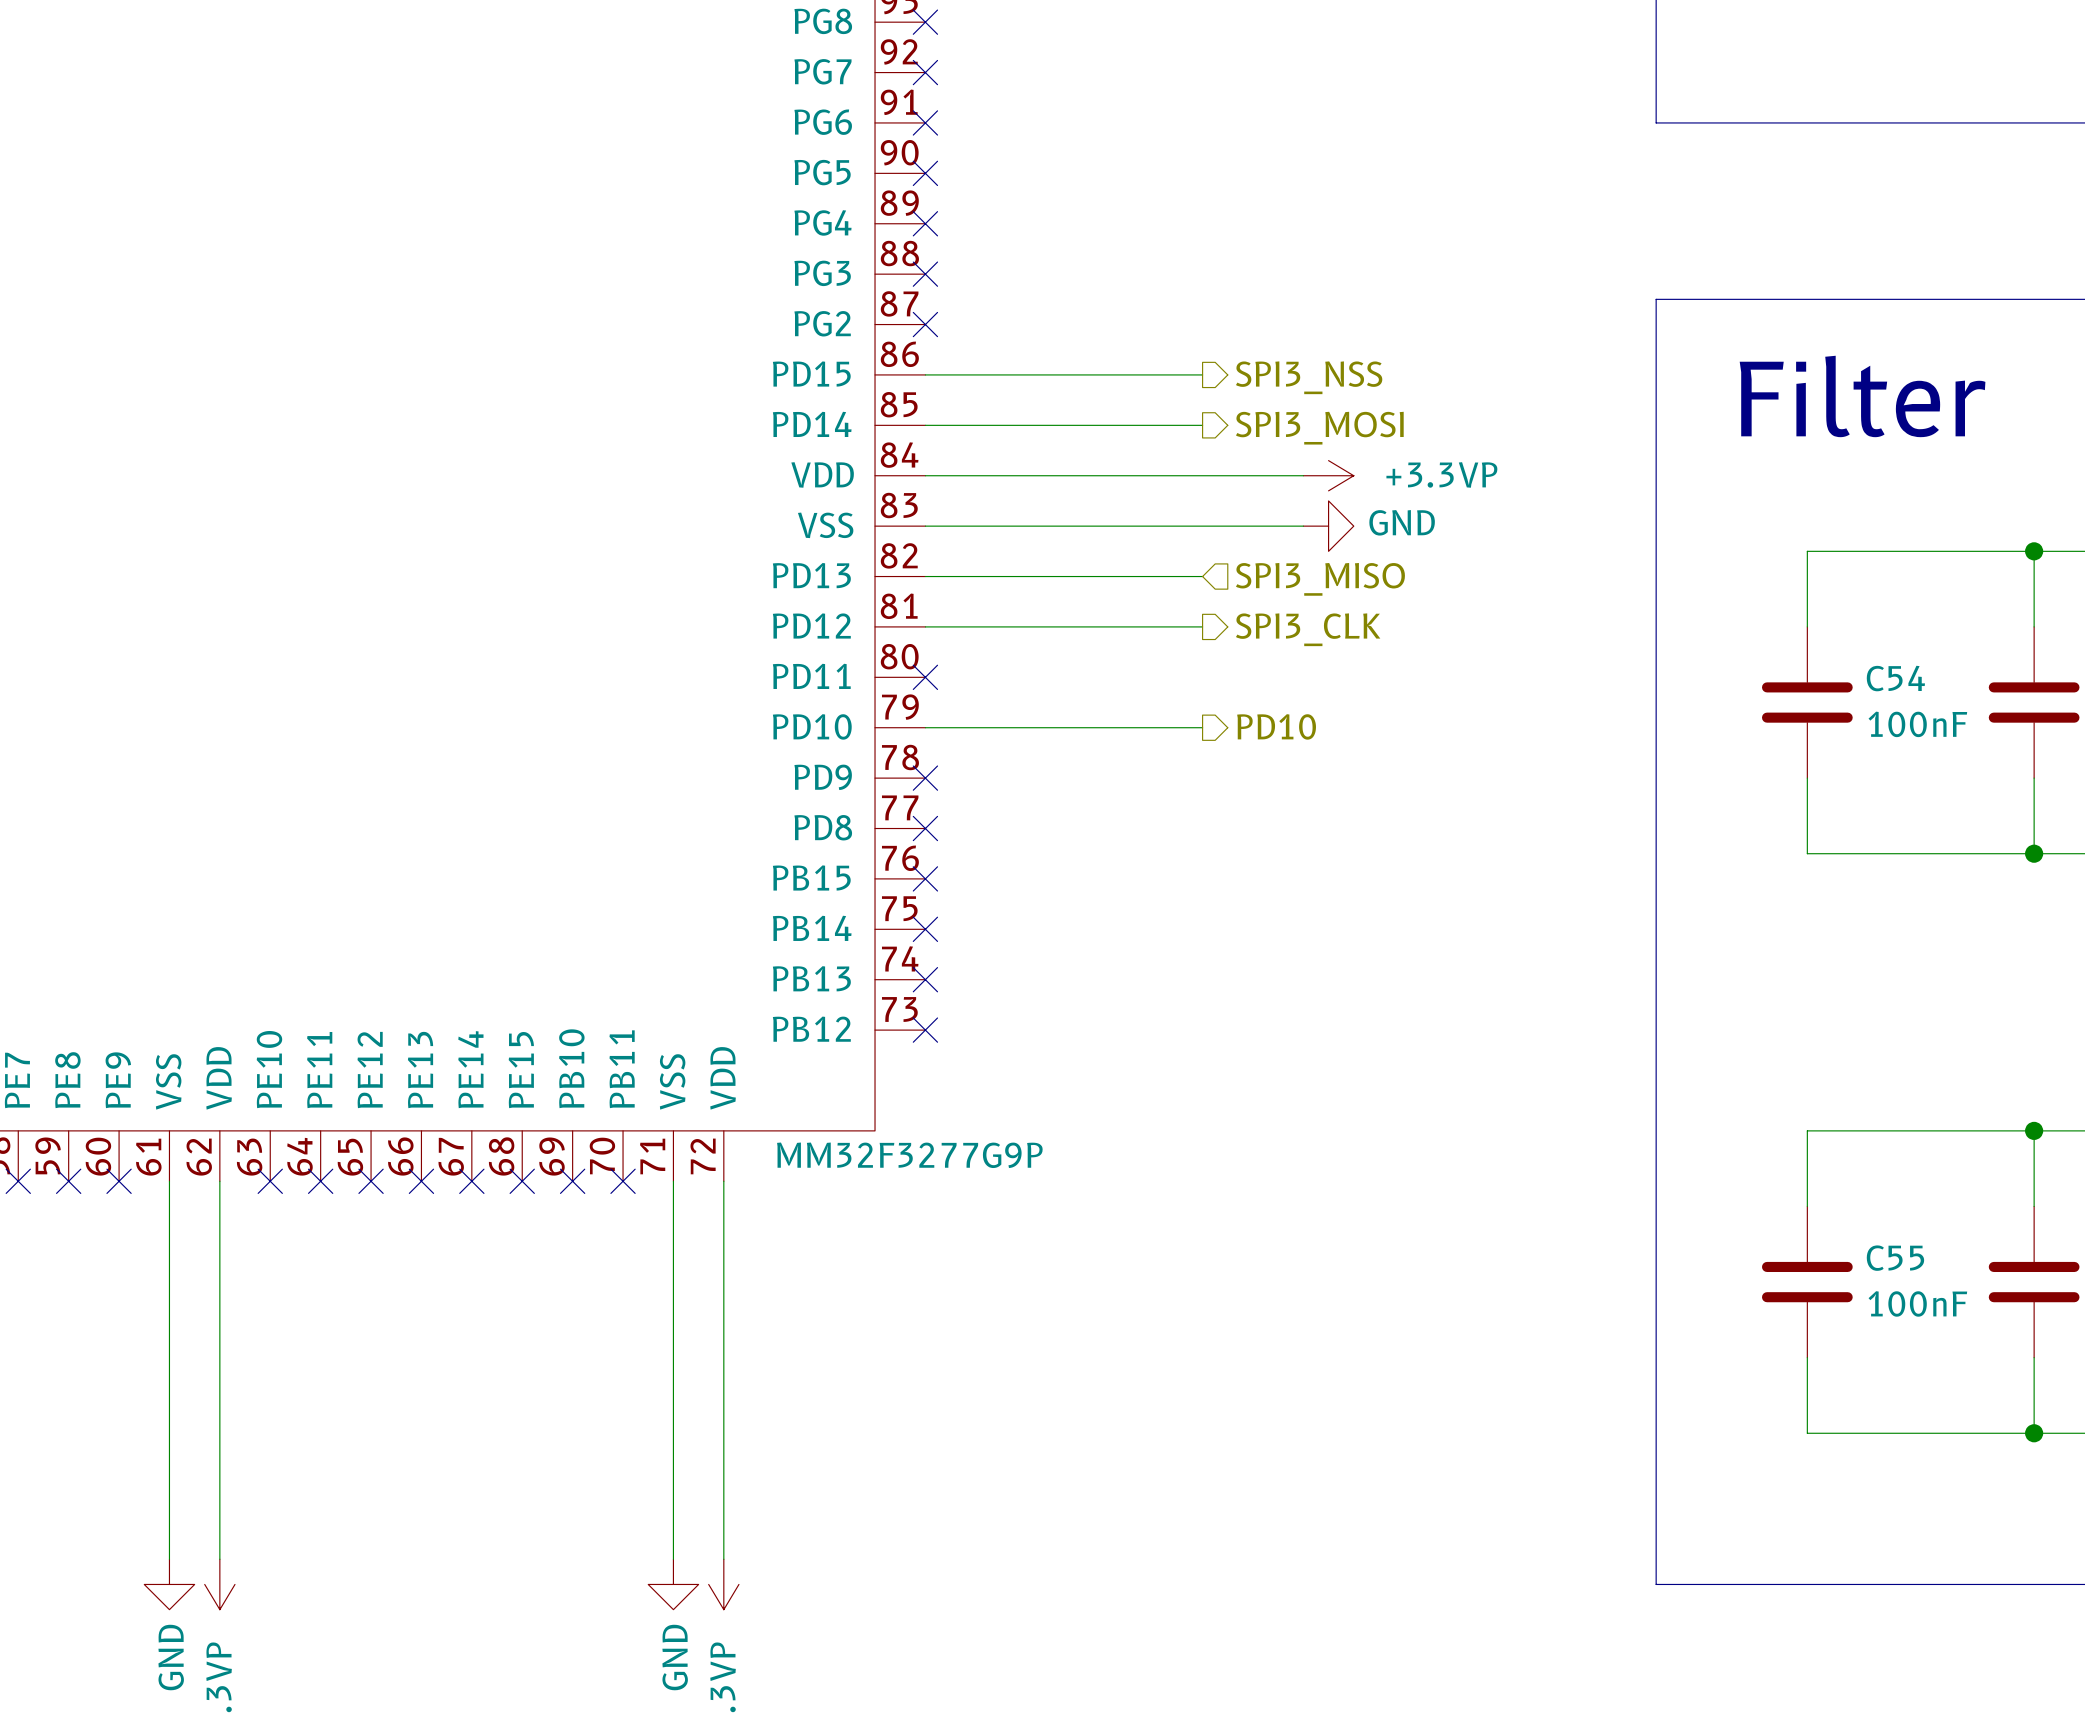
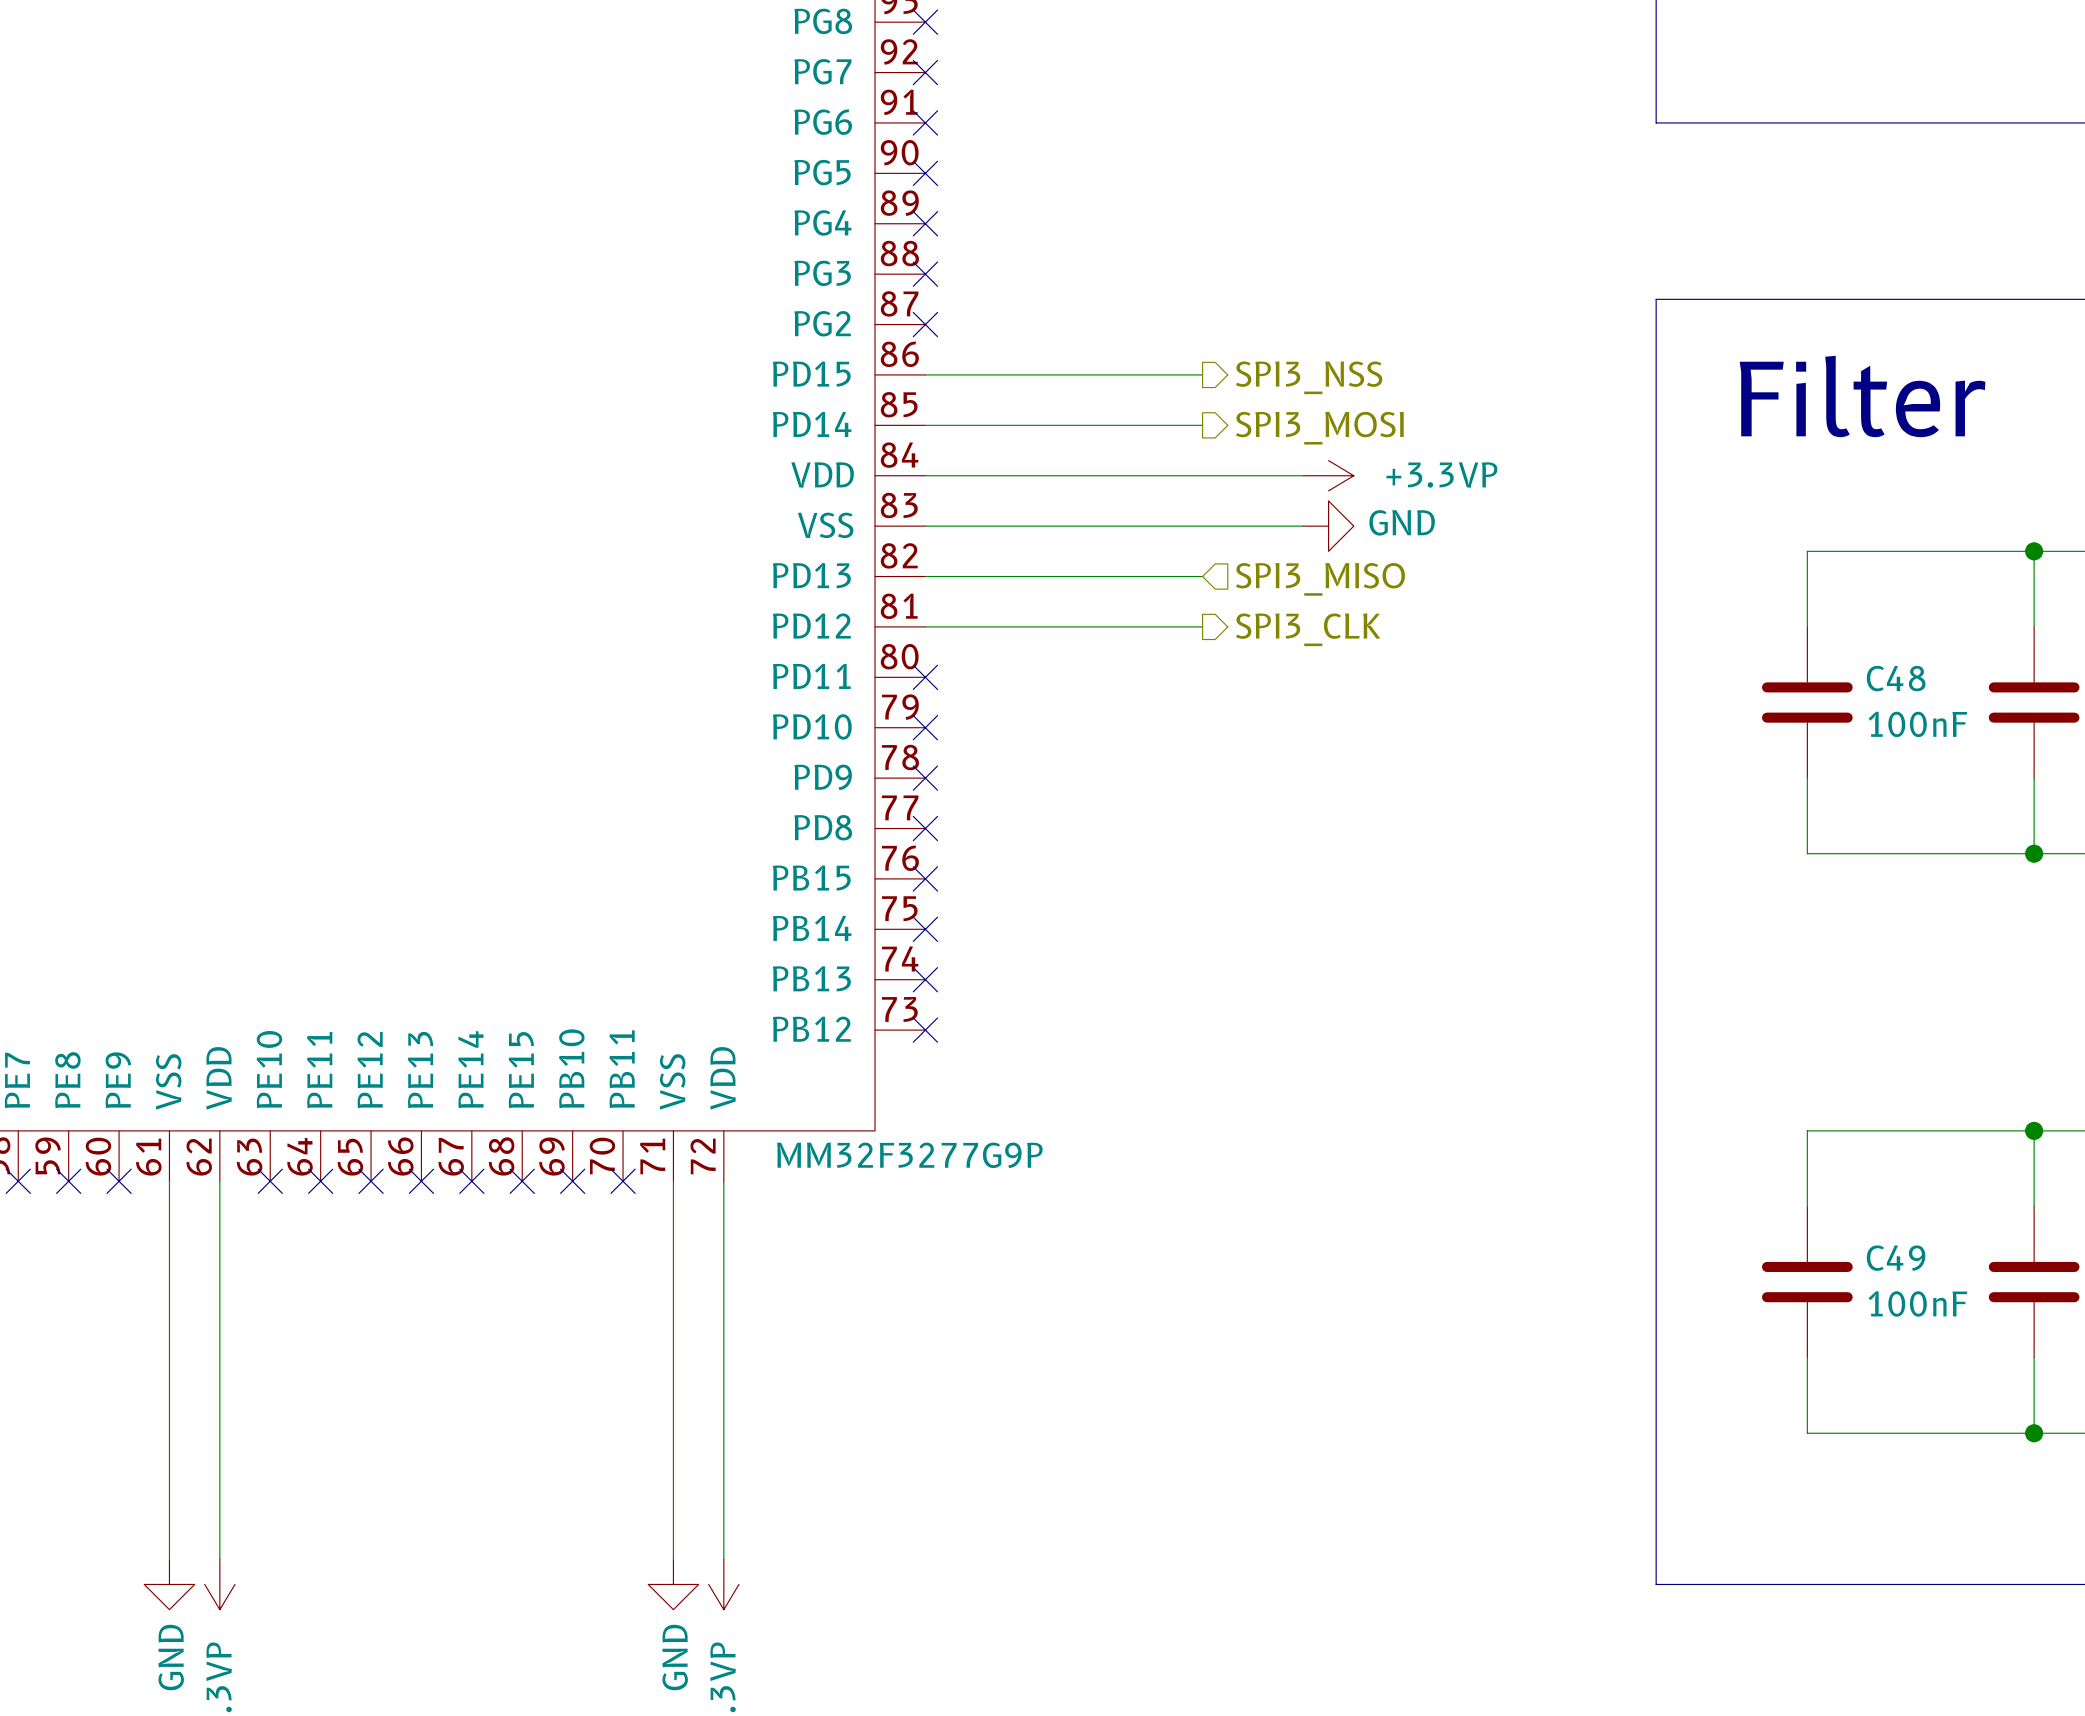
C54 name: C54 (1895, 678) -> C48 (1896, 678)
hierarchical label: PD10 (1276, 726) -> none
wire: (925, 727) (1202, 727) -> none
no-connect mark: none -> (925, 727)
C55 name: C55 (1895, 1258) -> C49 (1896, 1258)

